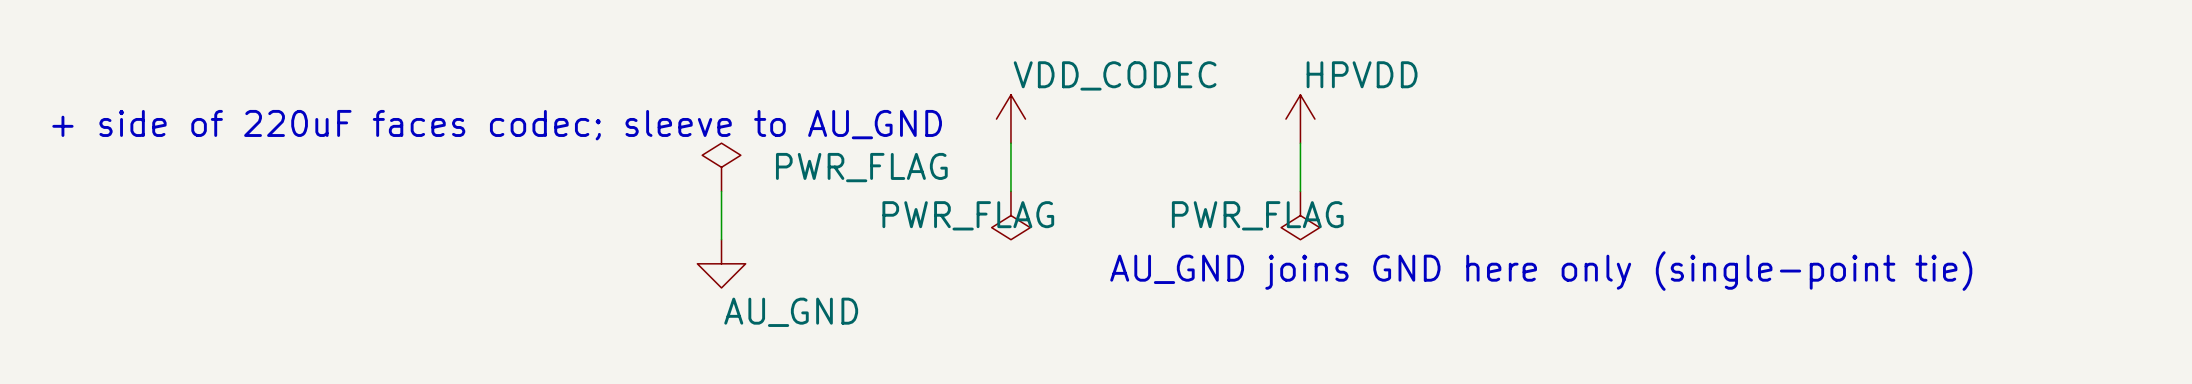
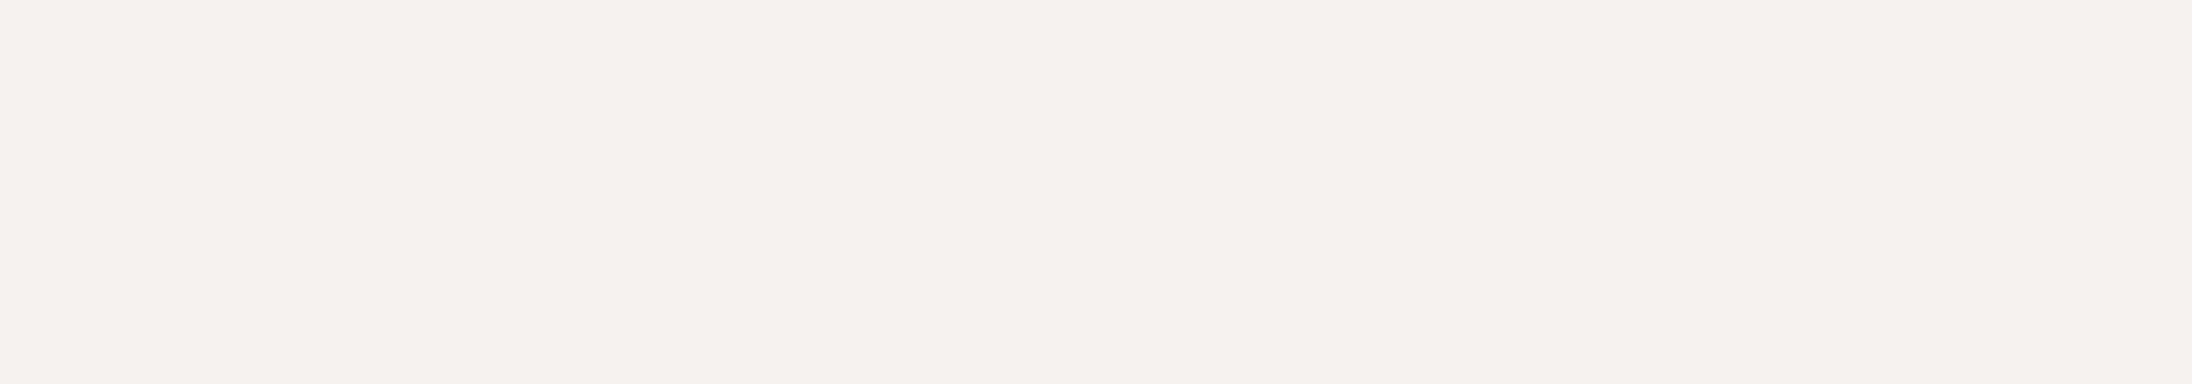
power symbol: VDD_CODEC (1010, 119) -> none
power symbol: HPVDD (1300, 119) -> none
text: + side of 220uF faces codec; sleeve to AU_GND (497, 125) -> none
wire: (1010, 143) (1010, 191) -> none
wire: (1300, 143) (1300, 191) -> none
power symbol: PWR_FLAG (721, 167) -> none
wire: (721, 191) (721, 239) -> none
power symbol: PWR_FLAG (1010, 215) -> none
power symbol: PWR_FLAG (1300, 215) -> none
power symbol: AU_GND (721, 263) -> none
text: AU_GND joins GND here only (single-point tie) (1541, 271) -> none

